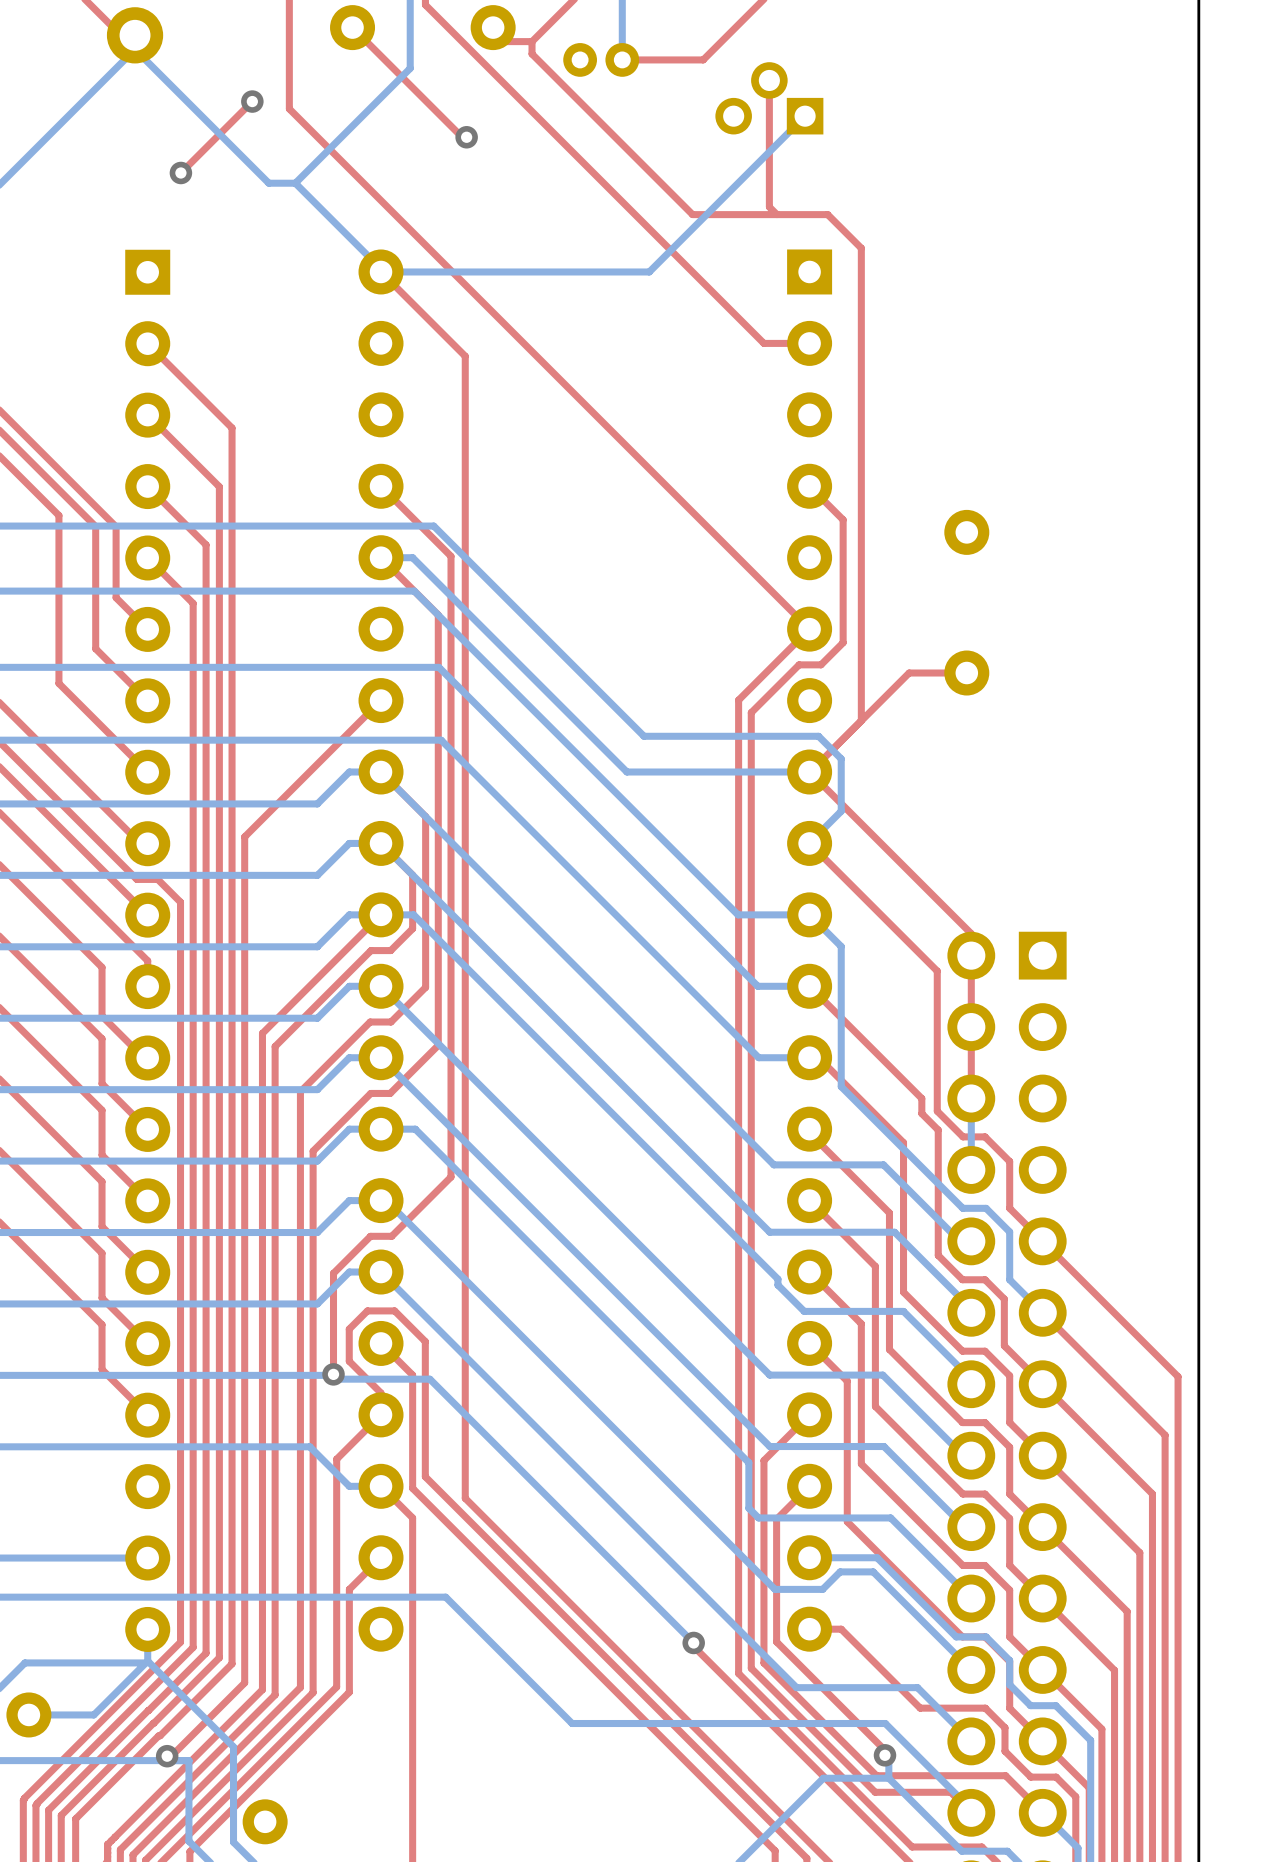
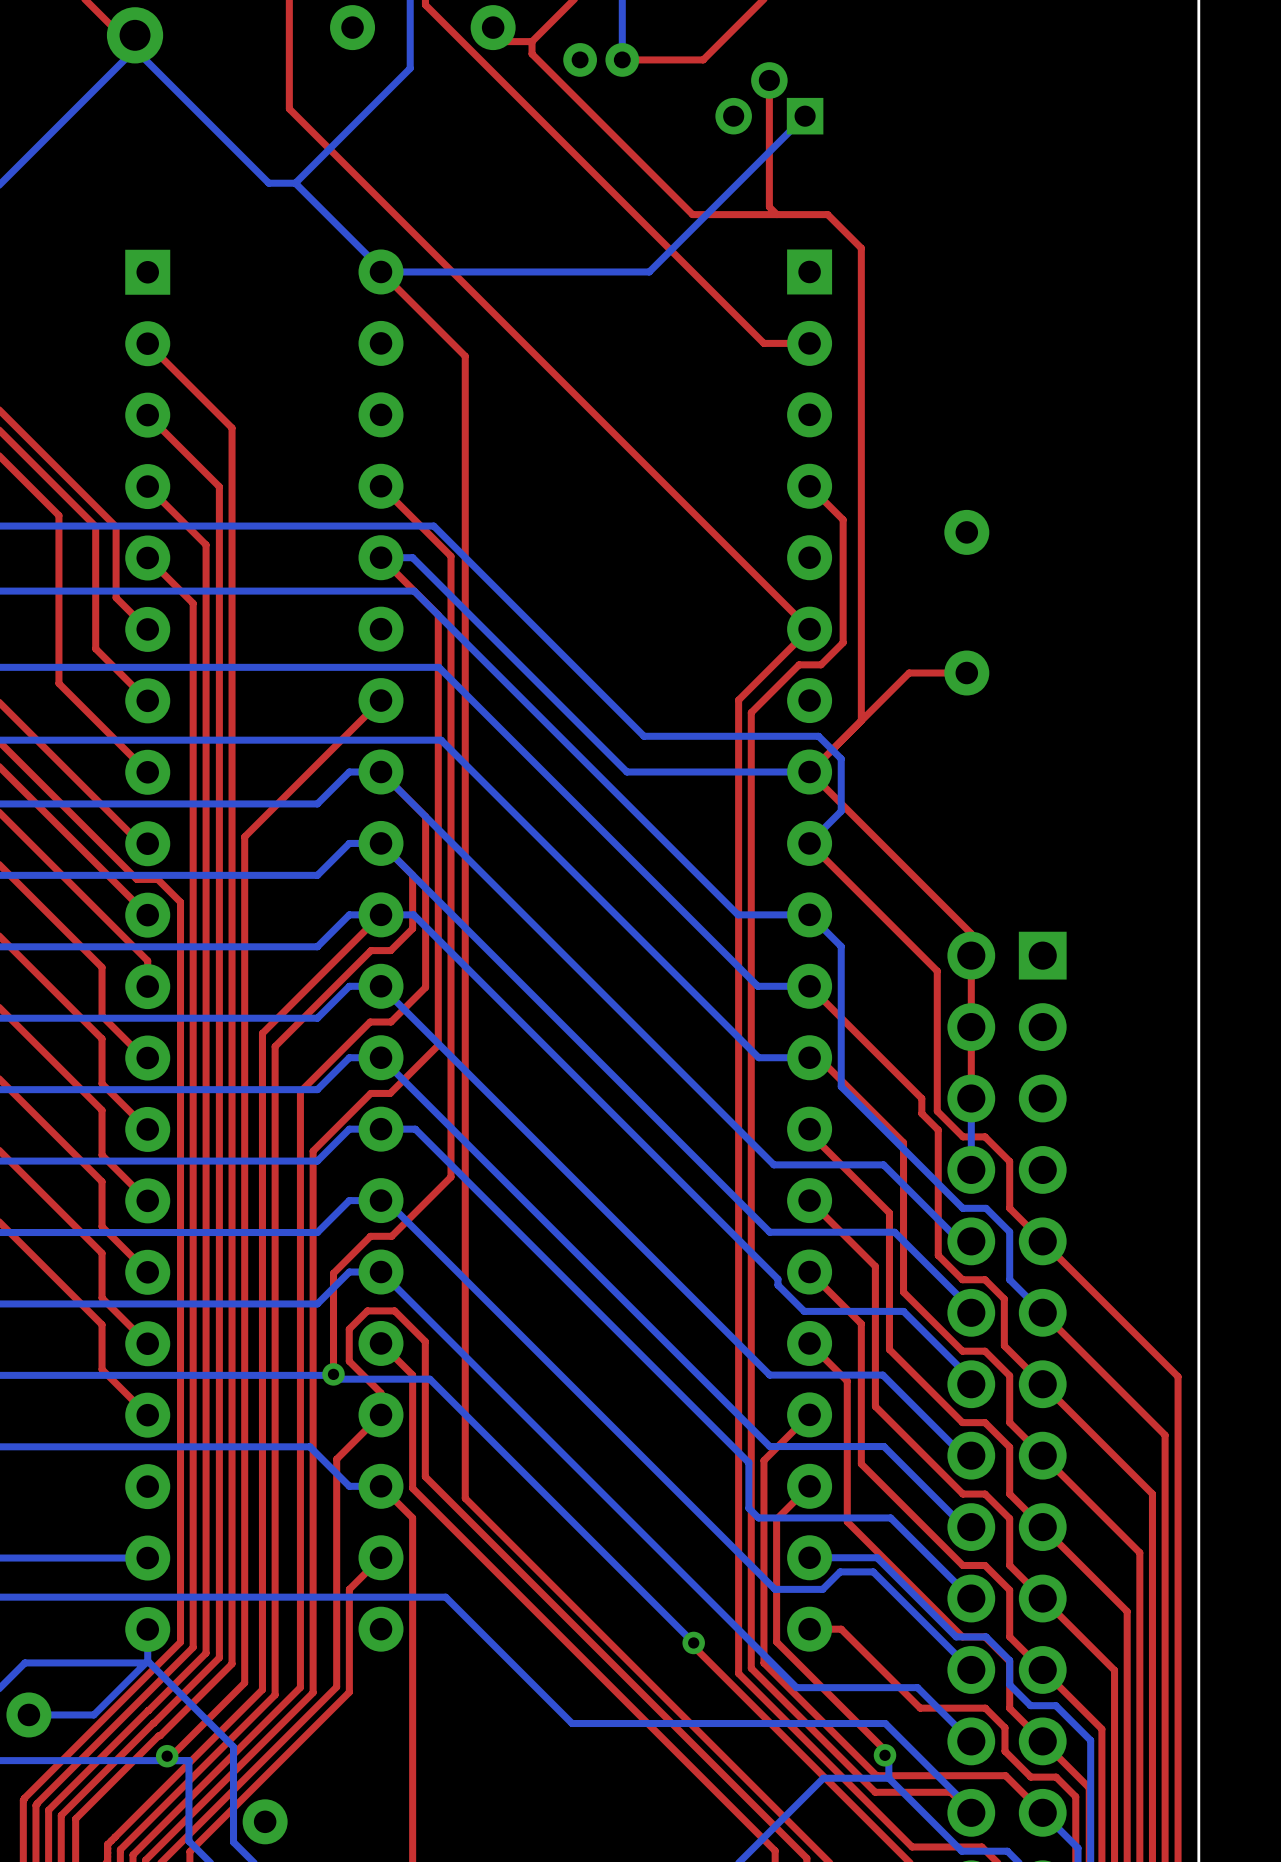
top track: (352, 27) (462, 137) (466, 137) -> none
top track: (252, 101) (180, 172) -> none
via: (252, 101) -> none
via: (466, 137) -> none
via: (180, 172) -> none

